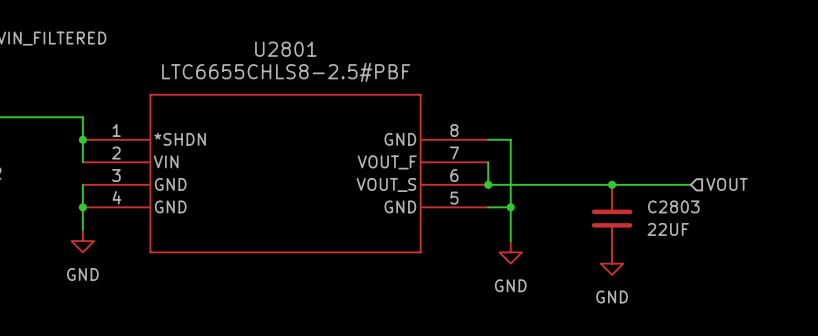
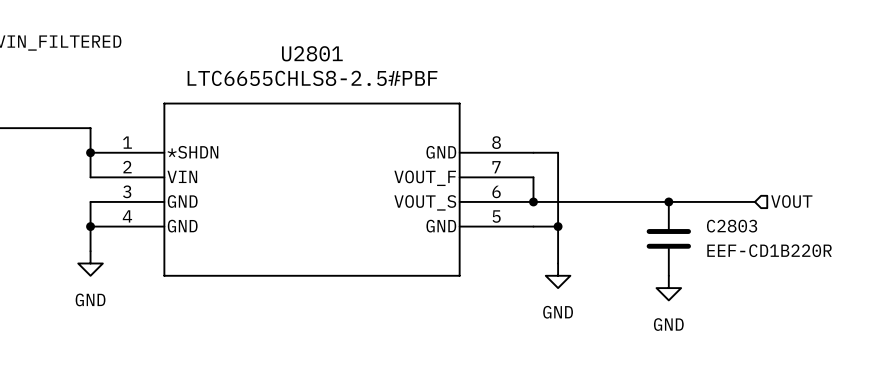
C2803 value: 22UF (668, 229) -> EEF-CD1B220R (769, 250)

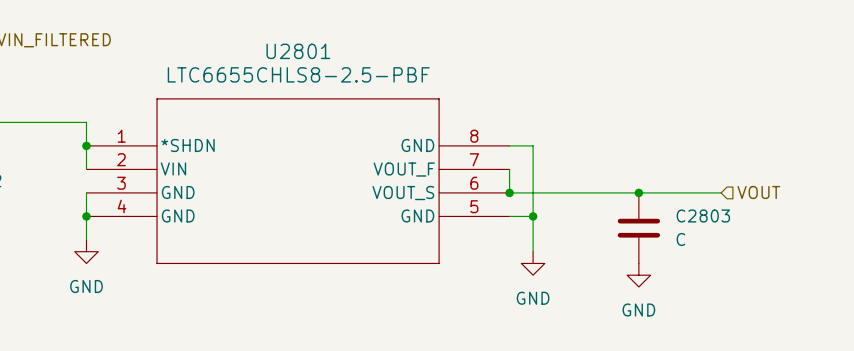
U2801 value: LTC6655CHLS8-2.5#PBF (312, 78) -> LTC6655CHLS8-2.5-PBF (298, 74)
C2803 value: EEF-CD1B220R (769, 250) -> C (680, 239)

